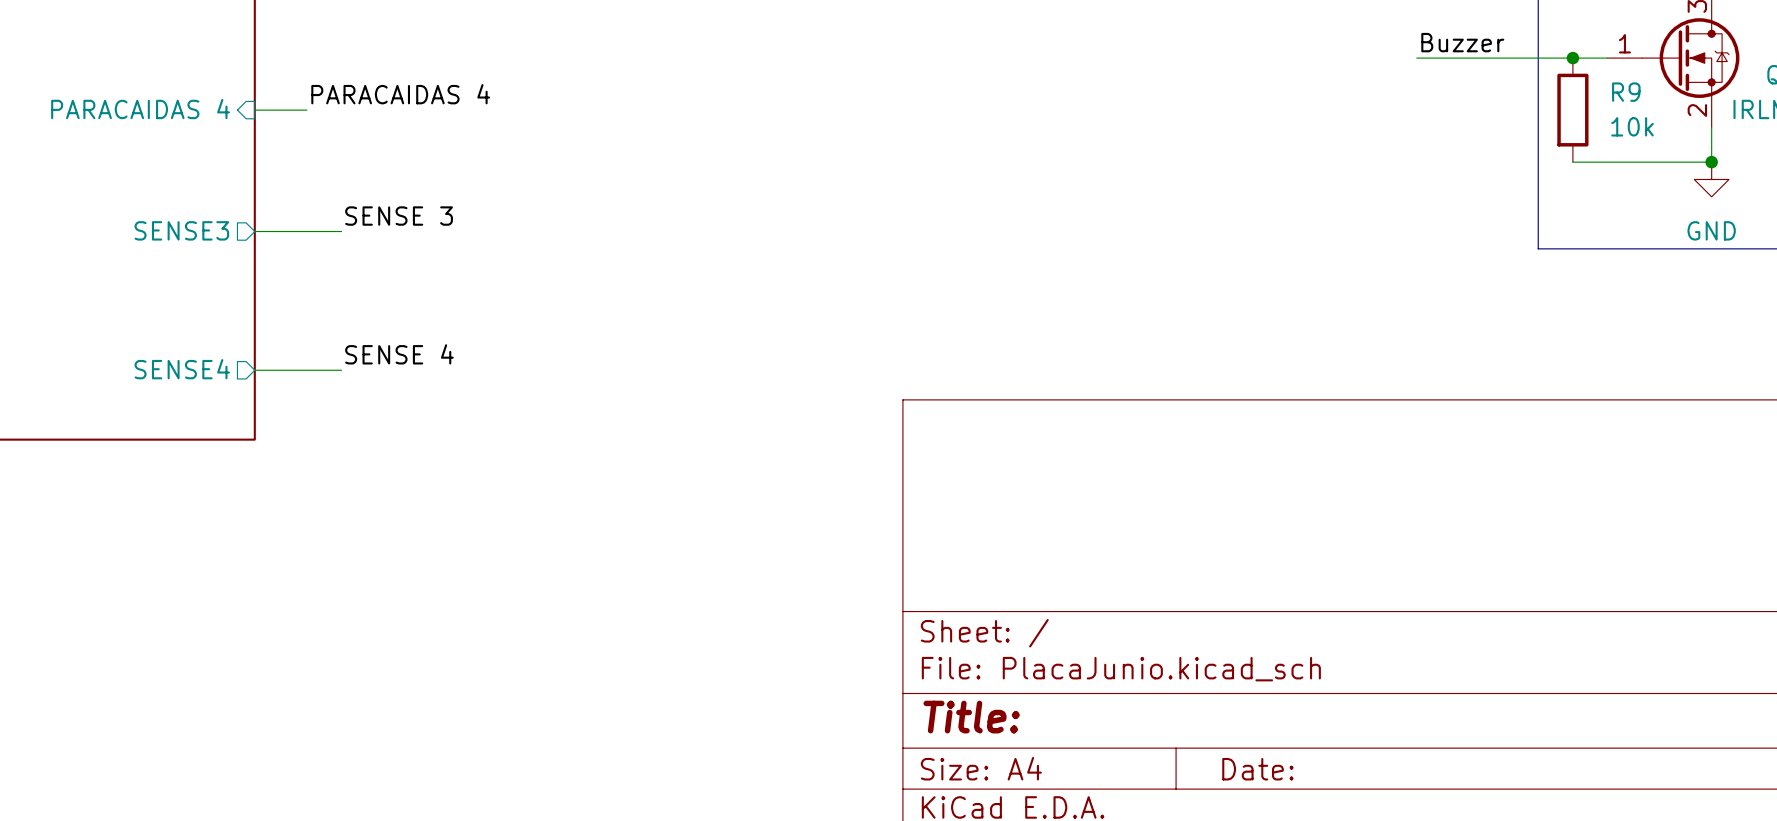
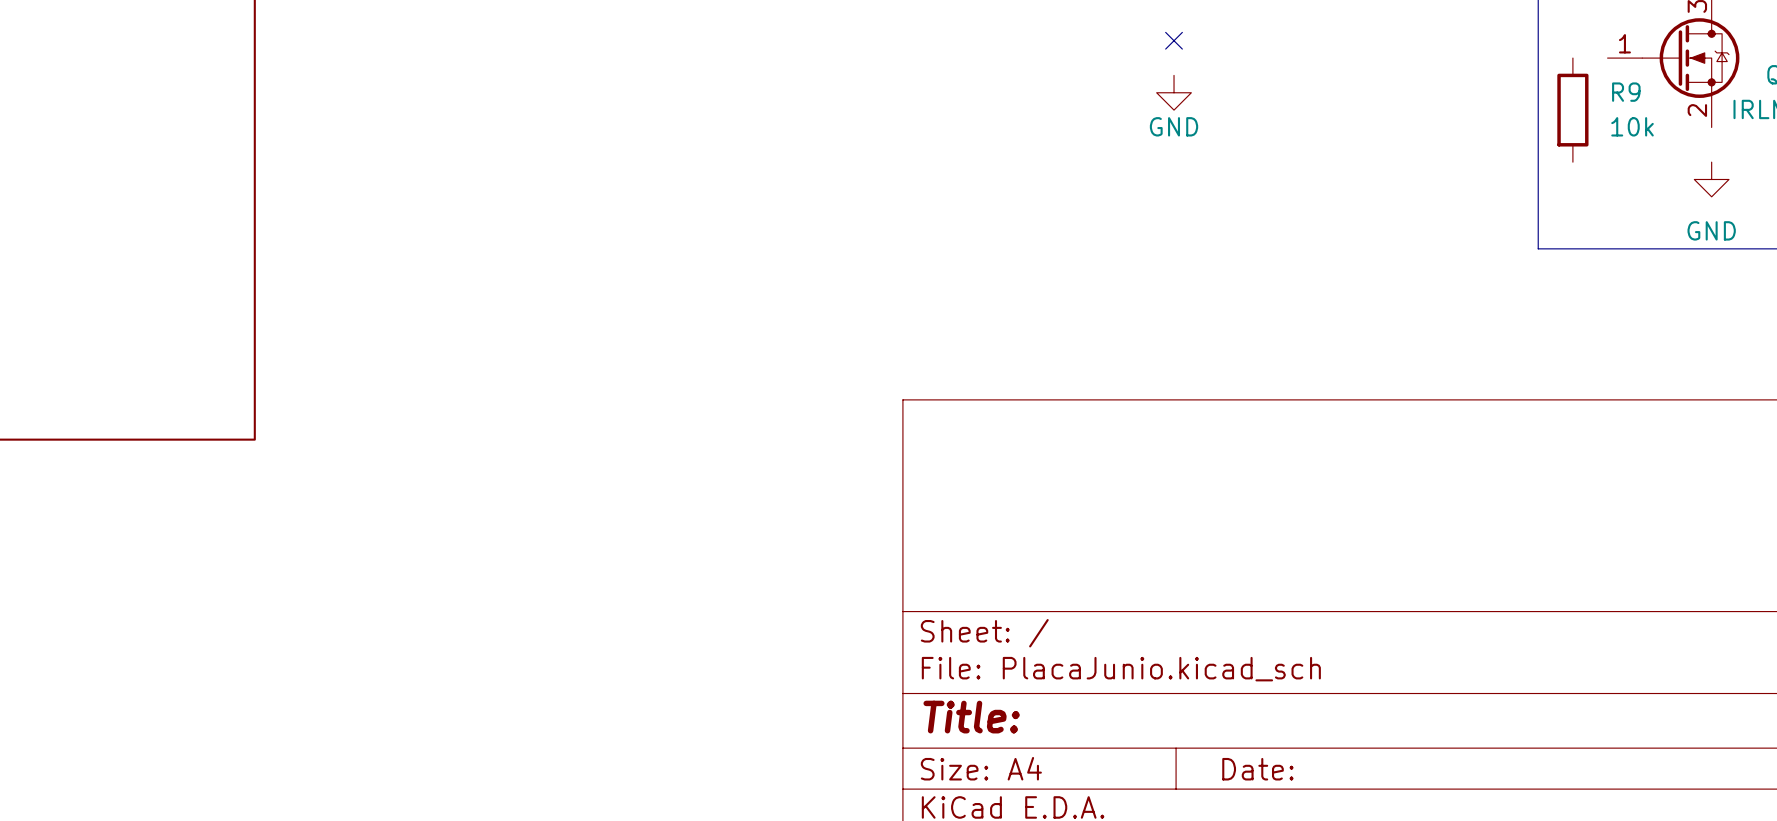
no-connect mark: none -> (1174, 40)
label: Buzzer (1462, 42) -> none
wire: (1416, 58) (1607, 58) -> none
junction: (1572, 58) -> none
power symbol: none -> GND (1174, 92)
label: PARACAIDAS 4 (400, 94) -> none
sheet pin: PARACAIDAS 4 (140, 109) -> none
wire: (254, 110) (306, 110) -> none
wire: (1711, 127) (1711, 162) (1572, 162) -> none
junction: (1711, 162) -> none
label: SENSE 3 (399, 216) -> none
sheet pin: SENSE3 (181, 230) -> none
wire: (254, 231) (341, 231) -> none
label: SENSE 4 (399, 354) -> none
sheet pin: SENSE4 (182, 369) -> none
wire: (254, 370) (341, 370) -> none

